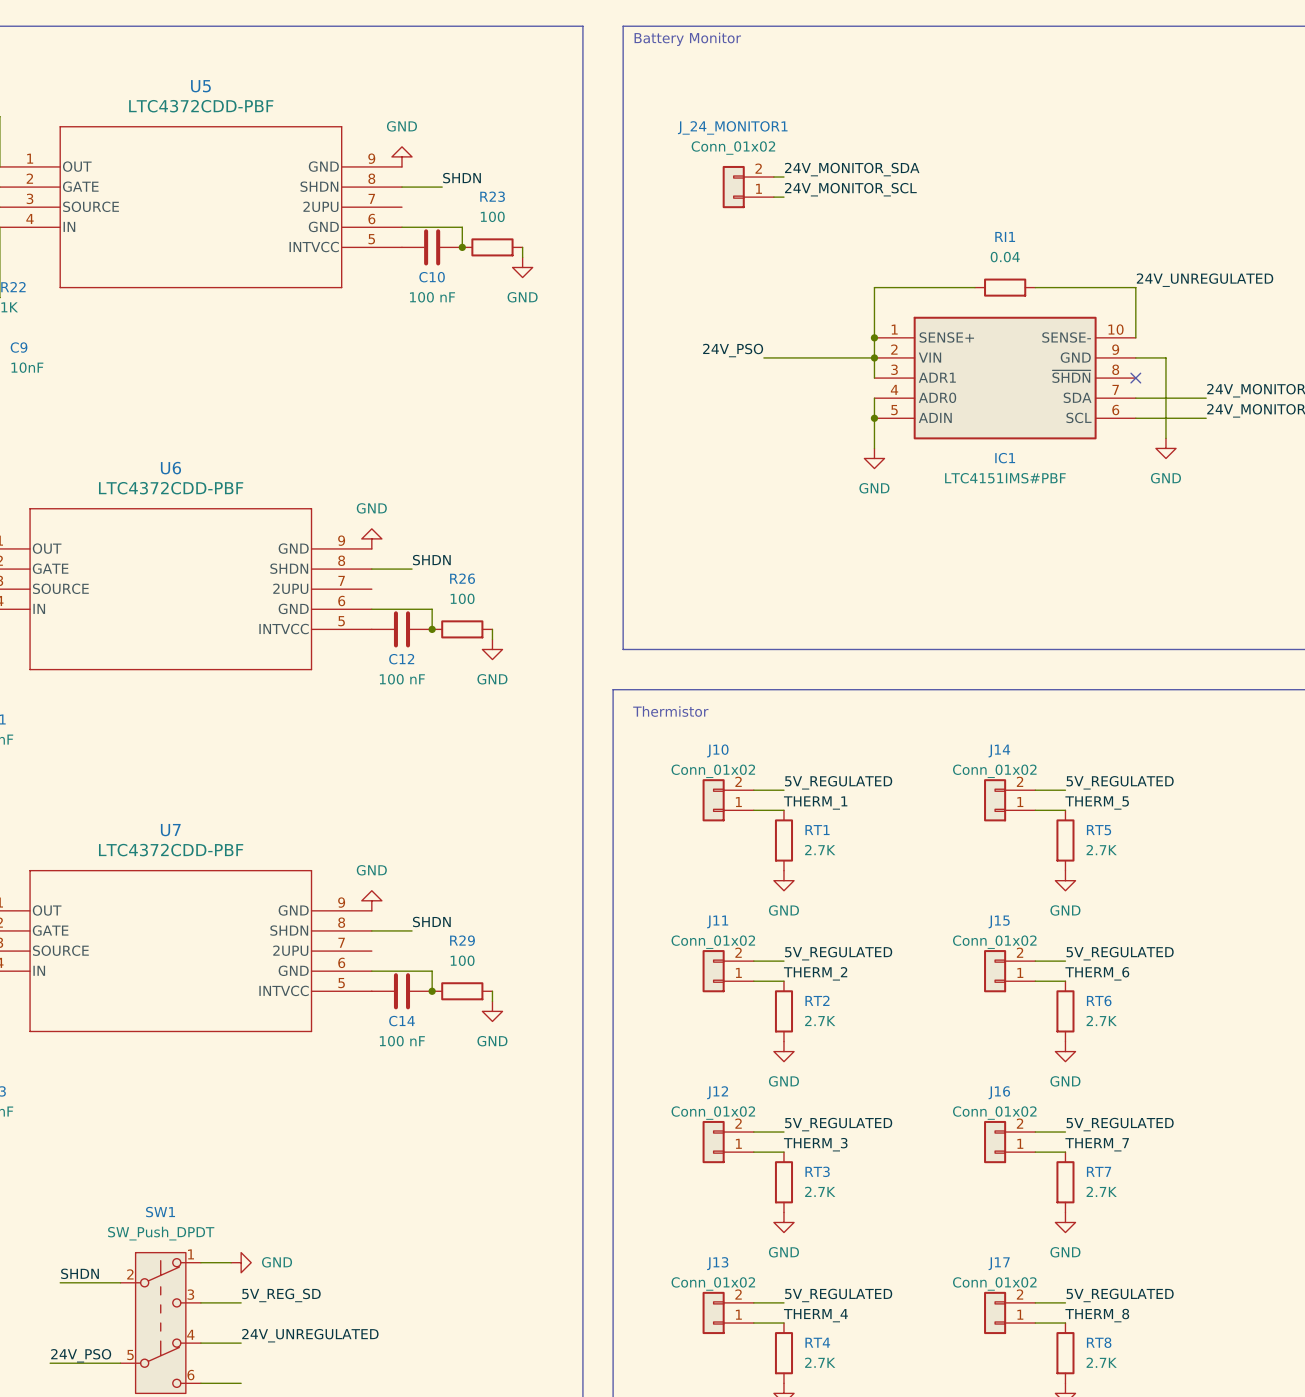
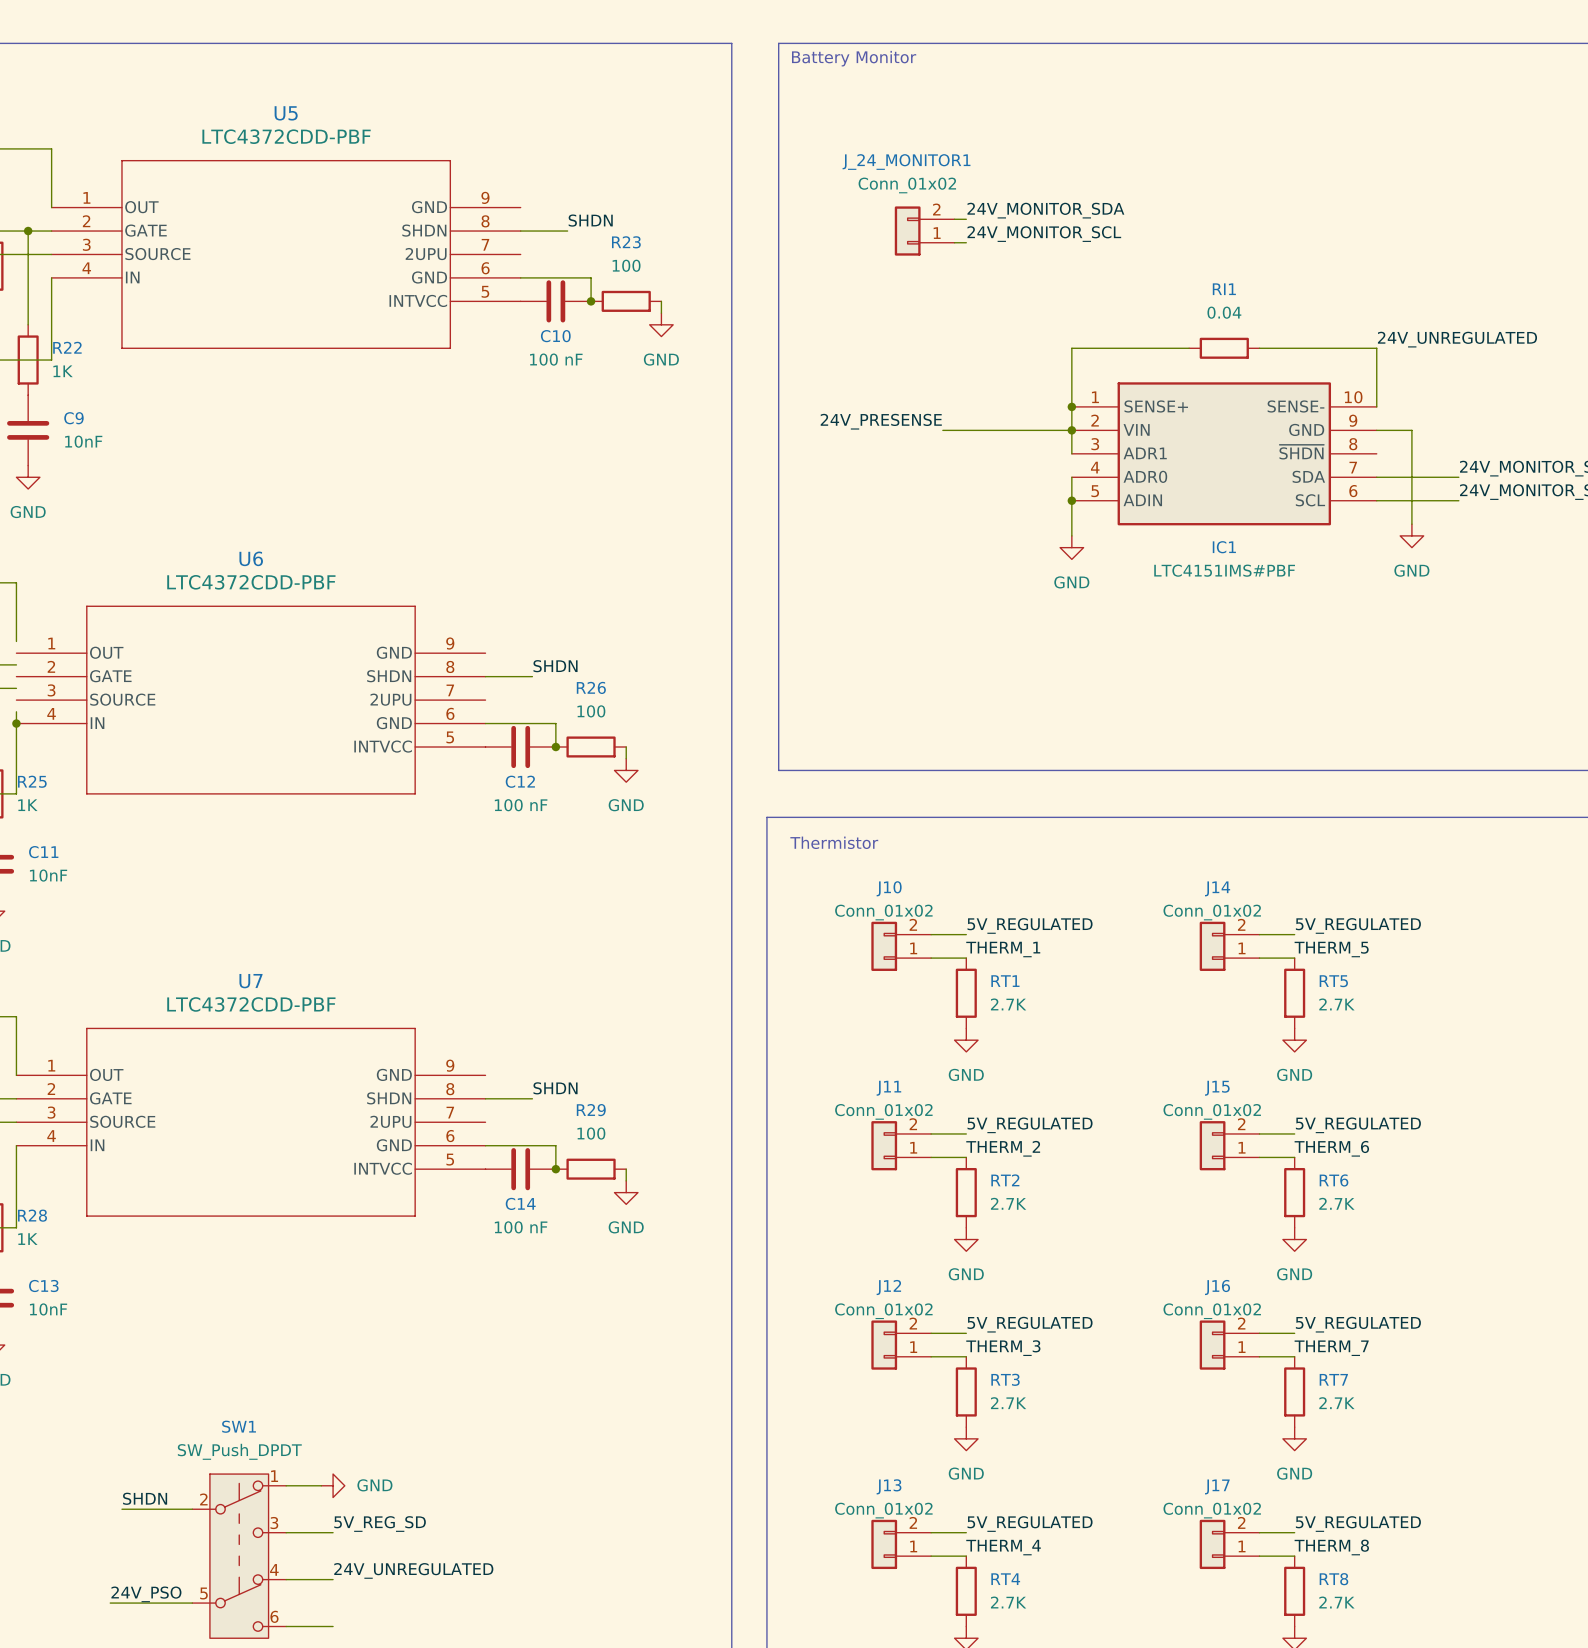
power symbol: GND (401, 156) -> none
label: 24V_PSO (733, 350) -> 24V_PRESENSE (881, 421)
no-connect mark: (1135, 378) -> none
power symbol: GND (371, 538) -> none
power symbol: GND (371, 900) -> none

